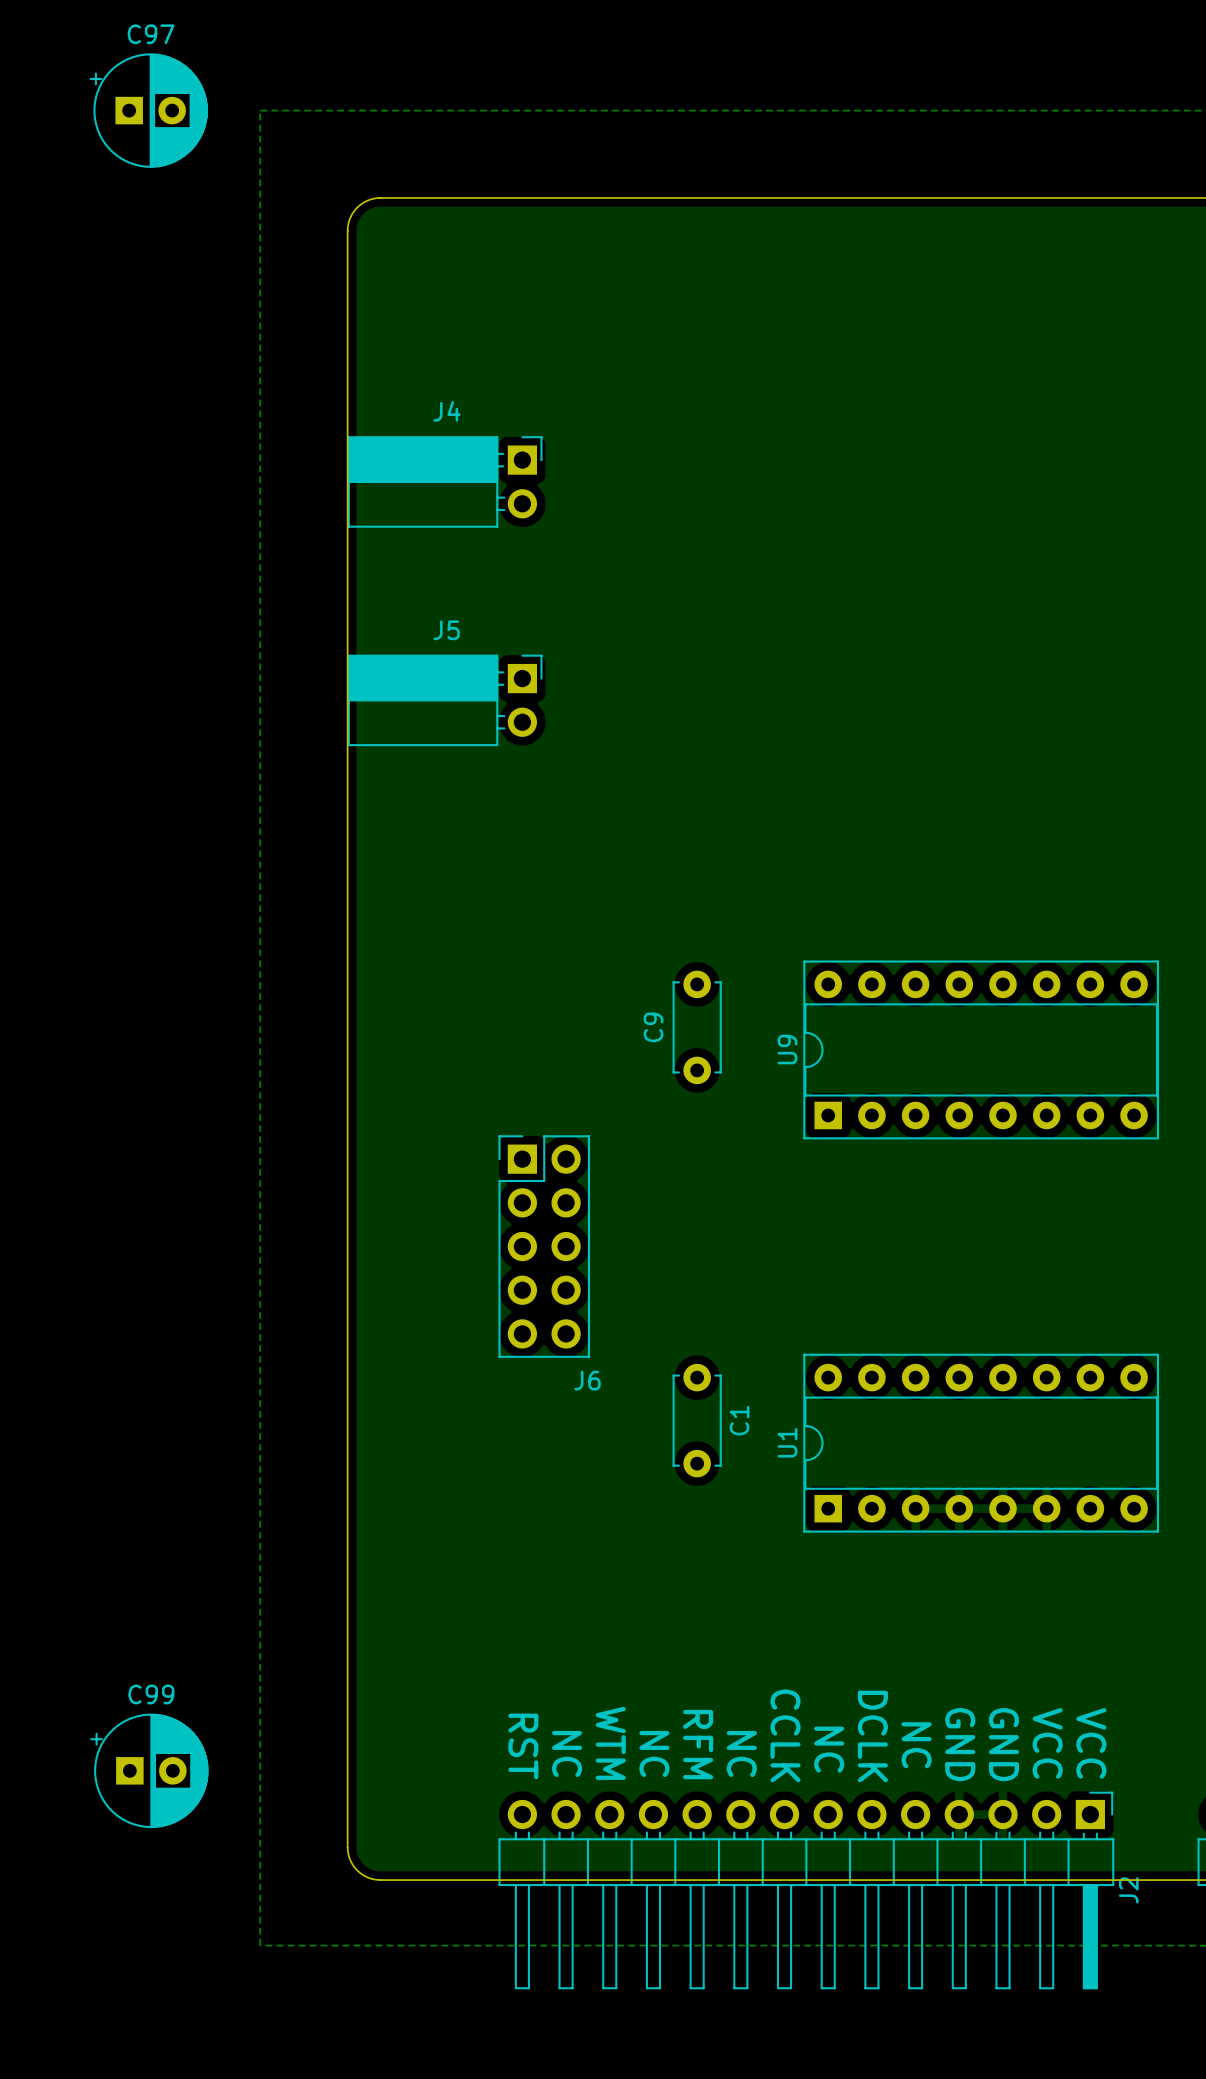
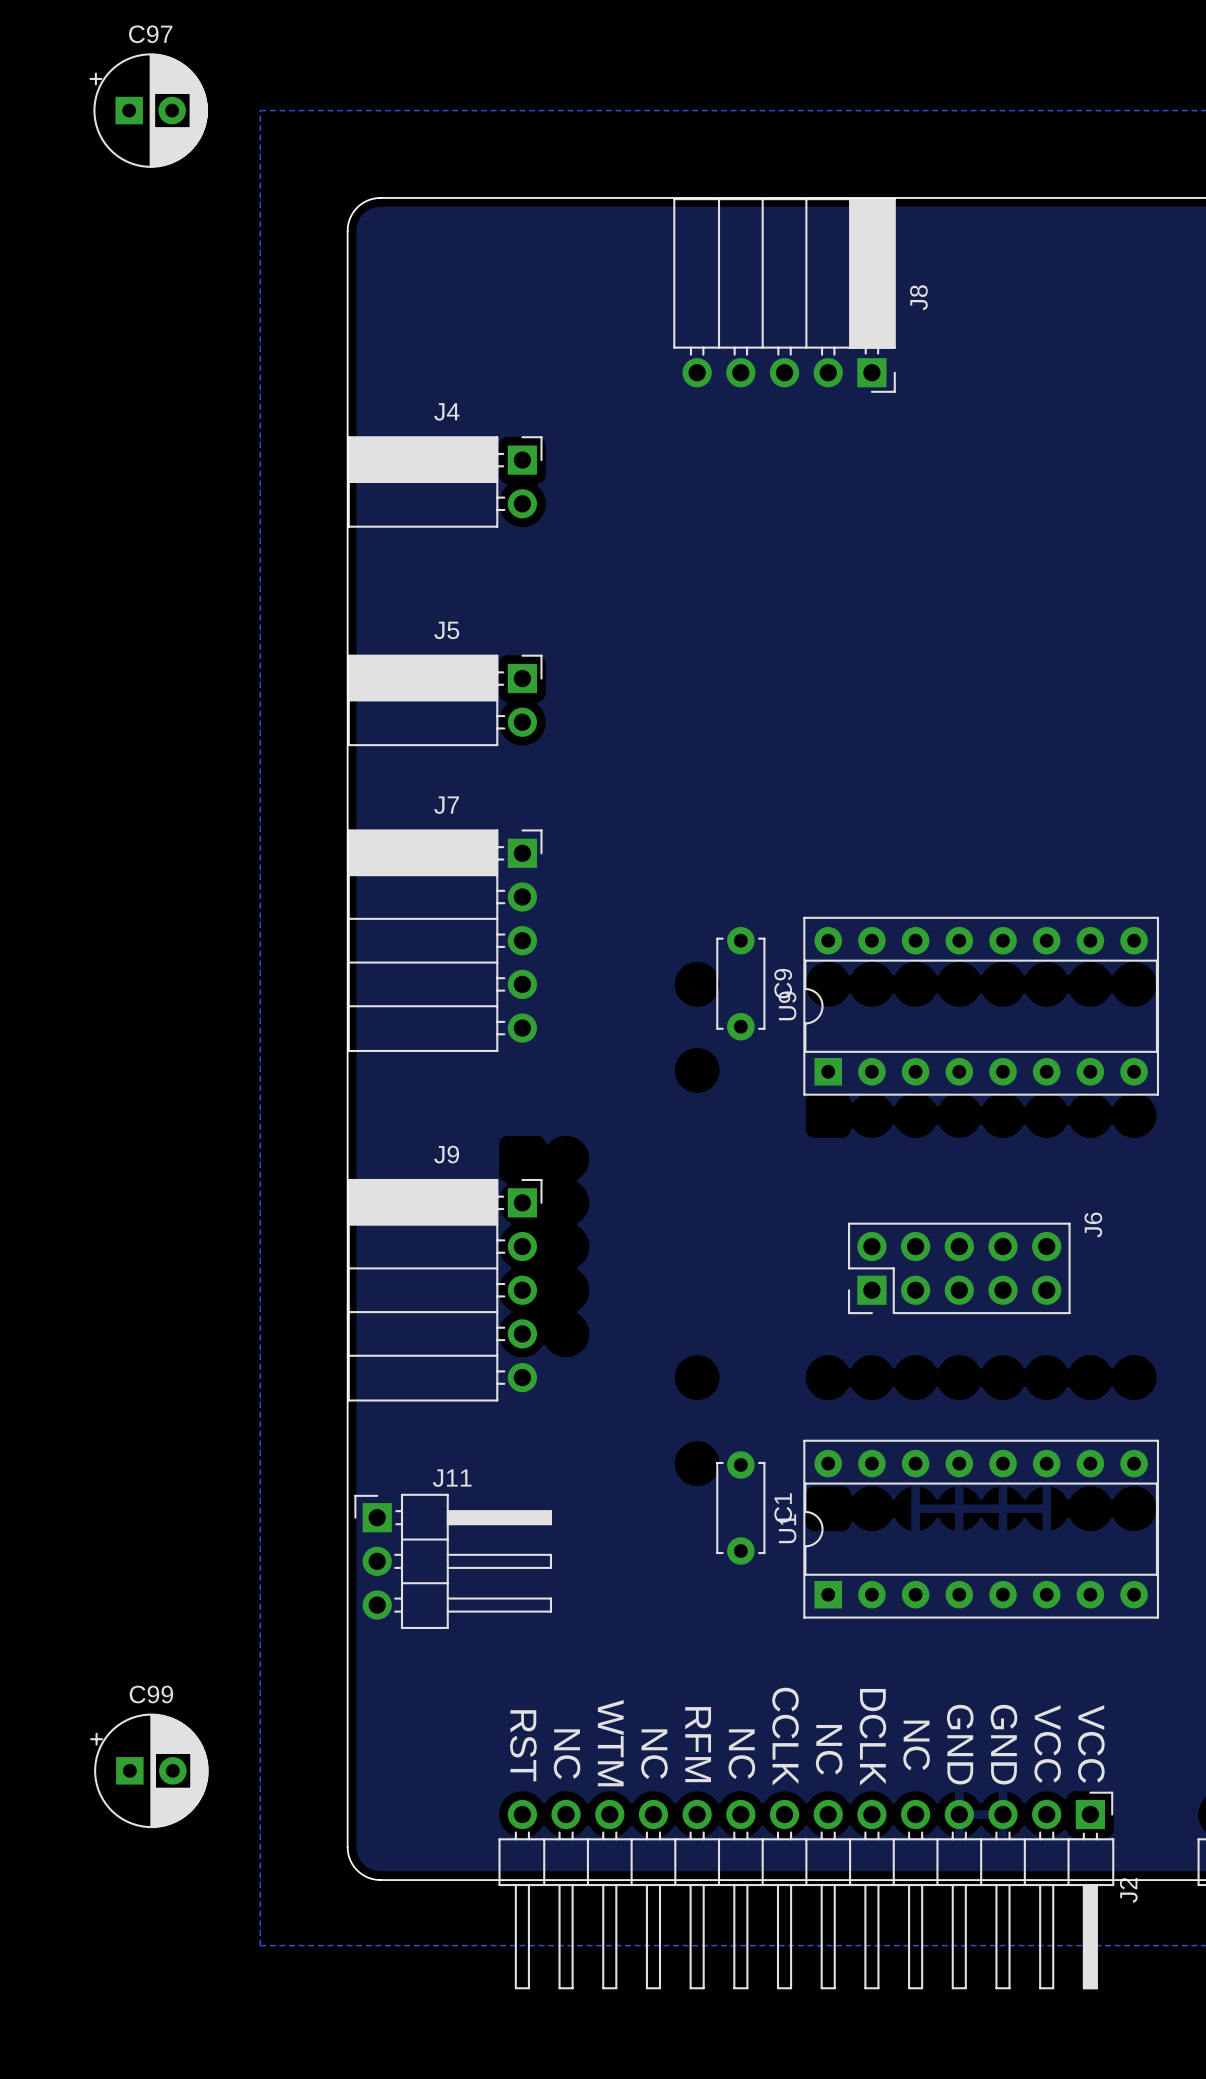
J8: none -> (784, 295)
J7: none -> (445, 940)
C9 name position: C9 (653, 1027) -> C9 (783, 983)
C9 position: (697, 1027) -> (740, 983)
U9 position: (981, 1049) -> (981, 1006)
J6 rotation: 0° (544, 1246) -> 90° counterclockwise (959, 1268)
J6 position: (544, 1246) -> (959, 1268)
J9: none -> (445, 1290)
C1 position: (697, 1420) -> (740, 1508)
U1 position: (981, 1443) -> (981, 1529)
J11: none -> (453, 1561)

